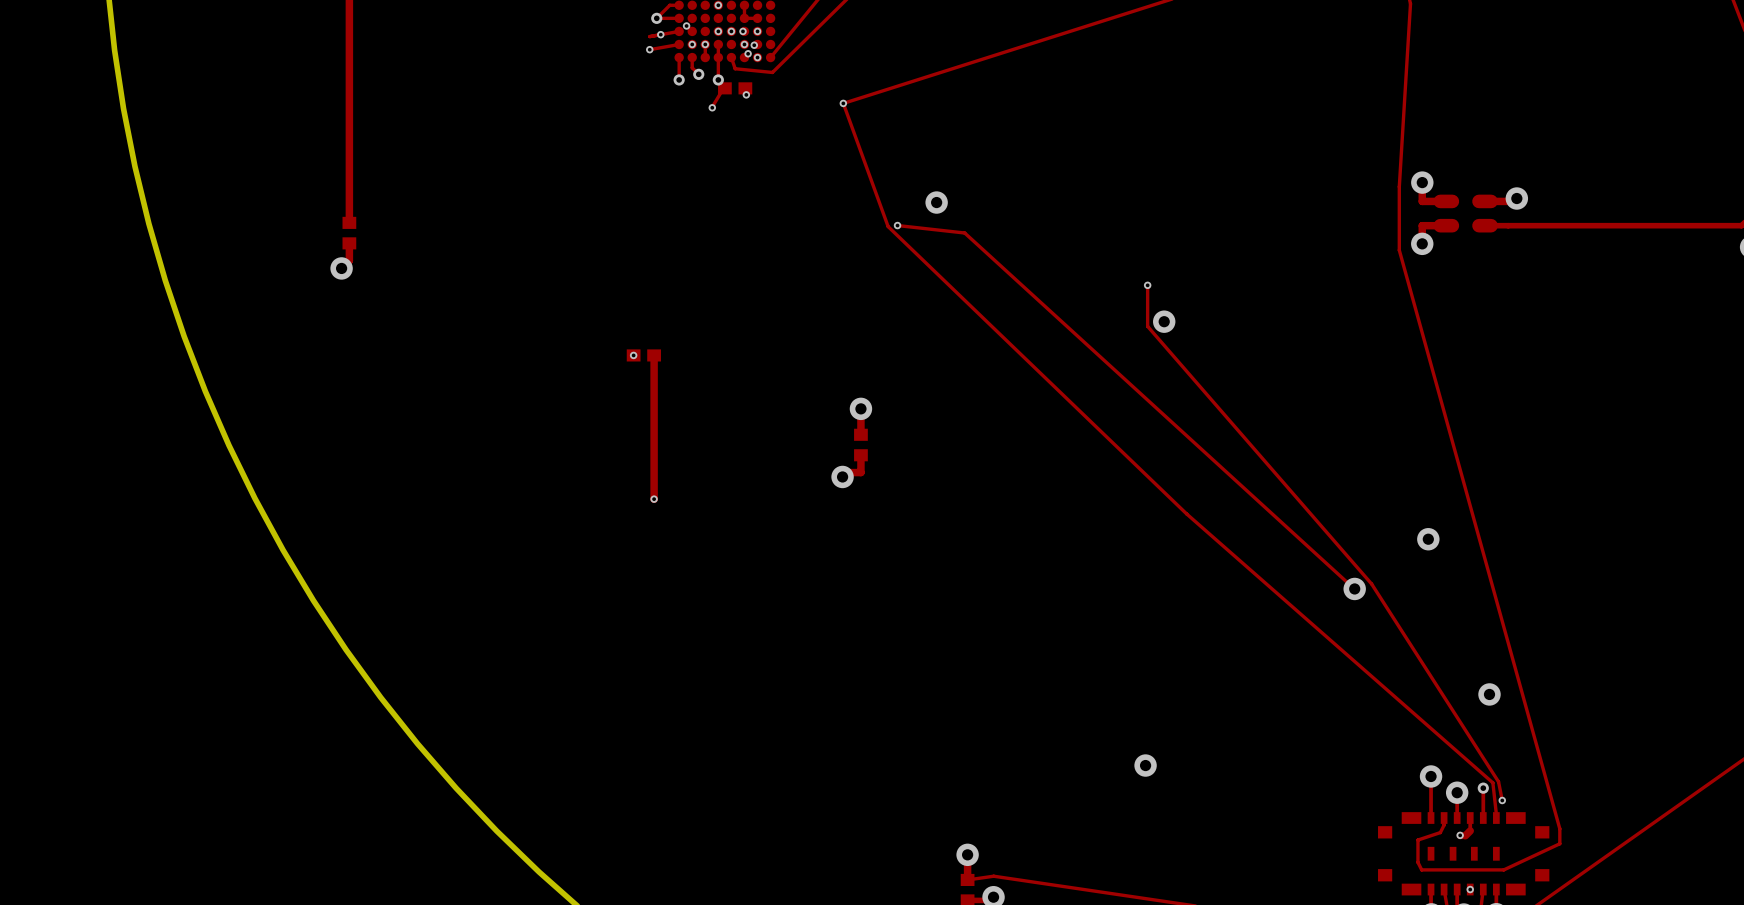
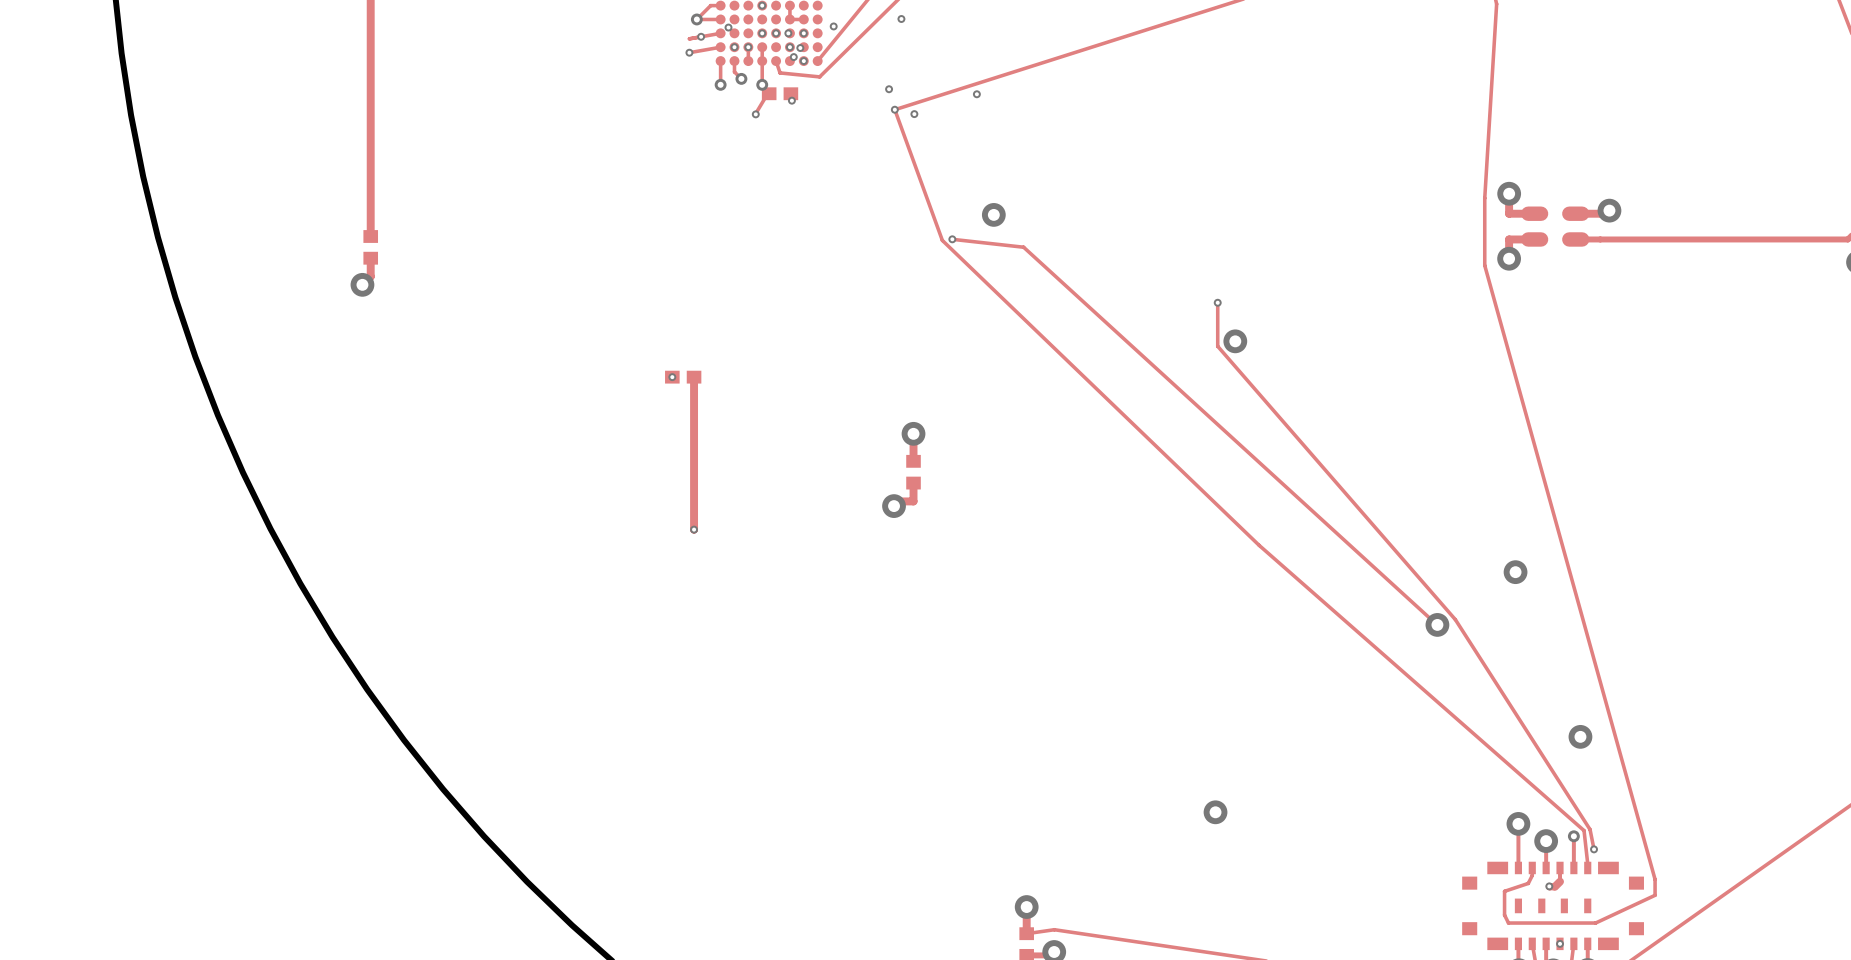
via: none -> (901, 19)
via: none -> (833, 26)
via: none -> (889, 89)
via: none -> (976, 94)
via: none -> (914, 114)

